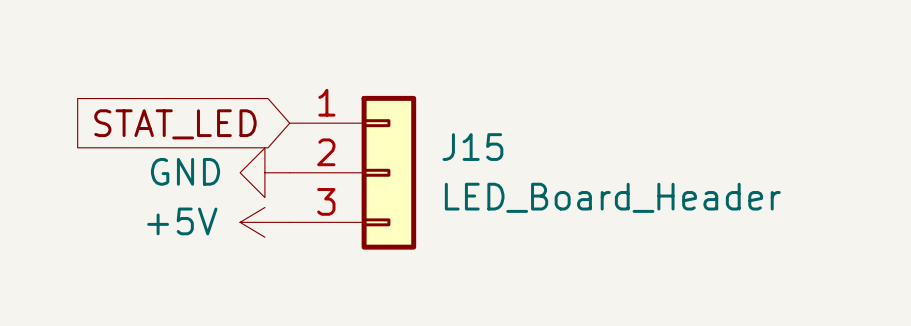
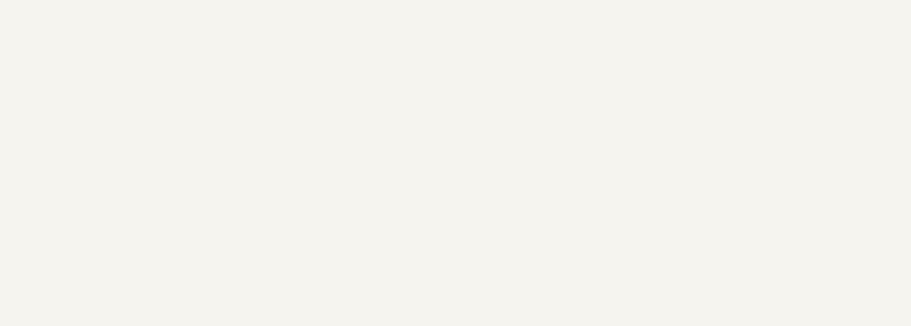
global label: STAT_LED (175, 124) -> none
power symbol: GND (264, 172) -> none
J15: LED_Board_Header (352, 172) -> none
power symbol: +5V (264, 222) -> none

